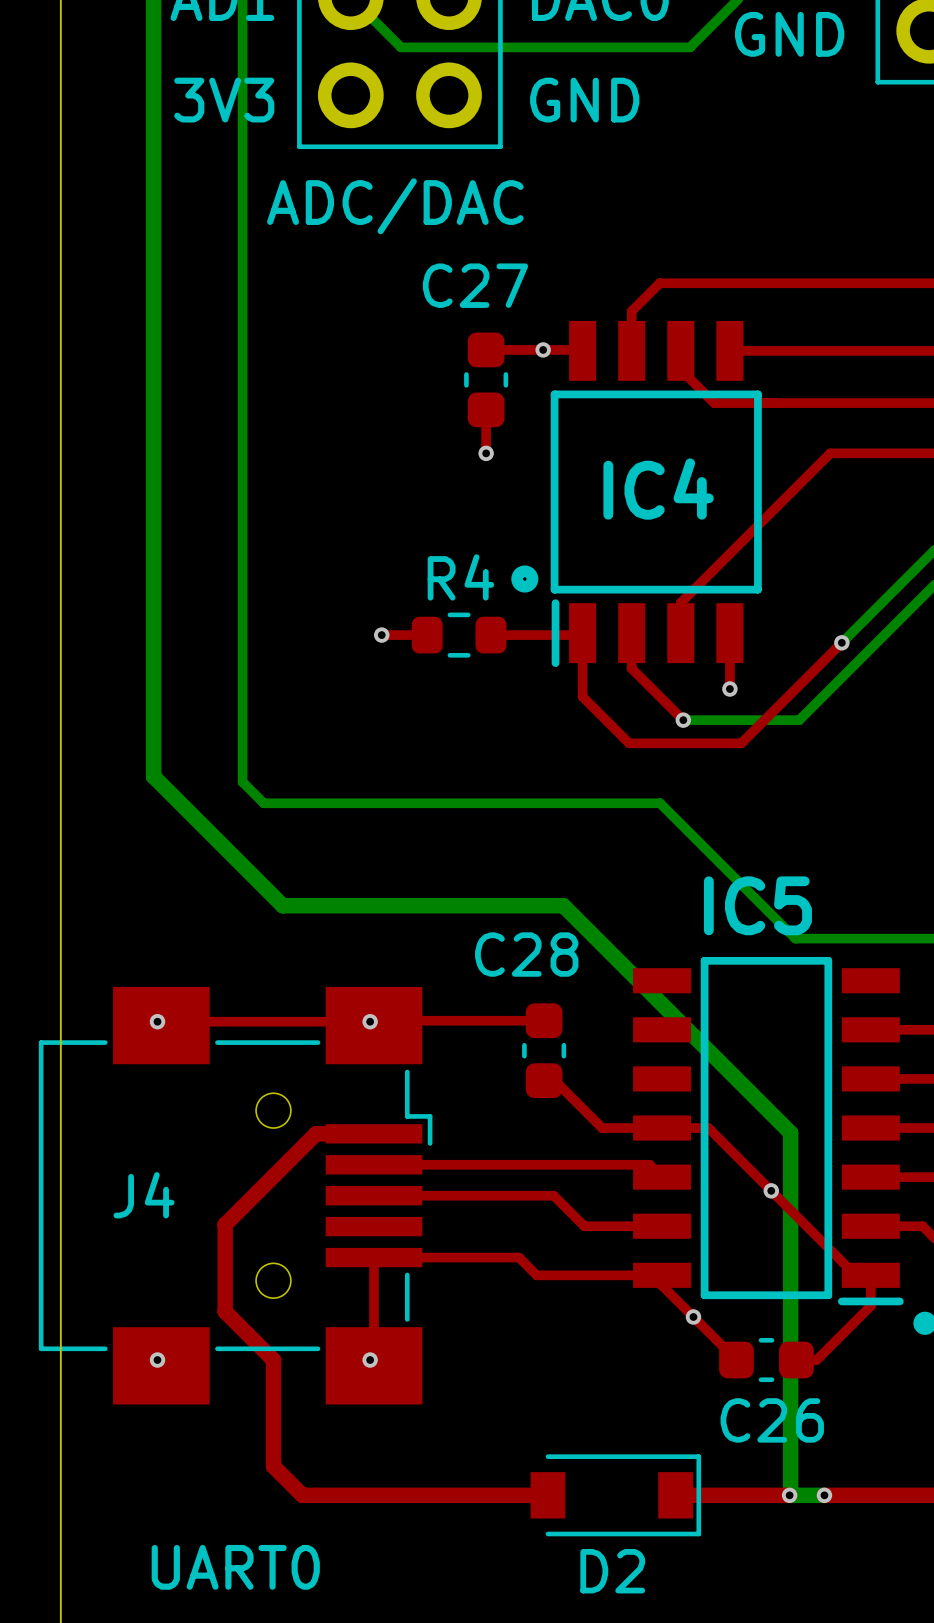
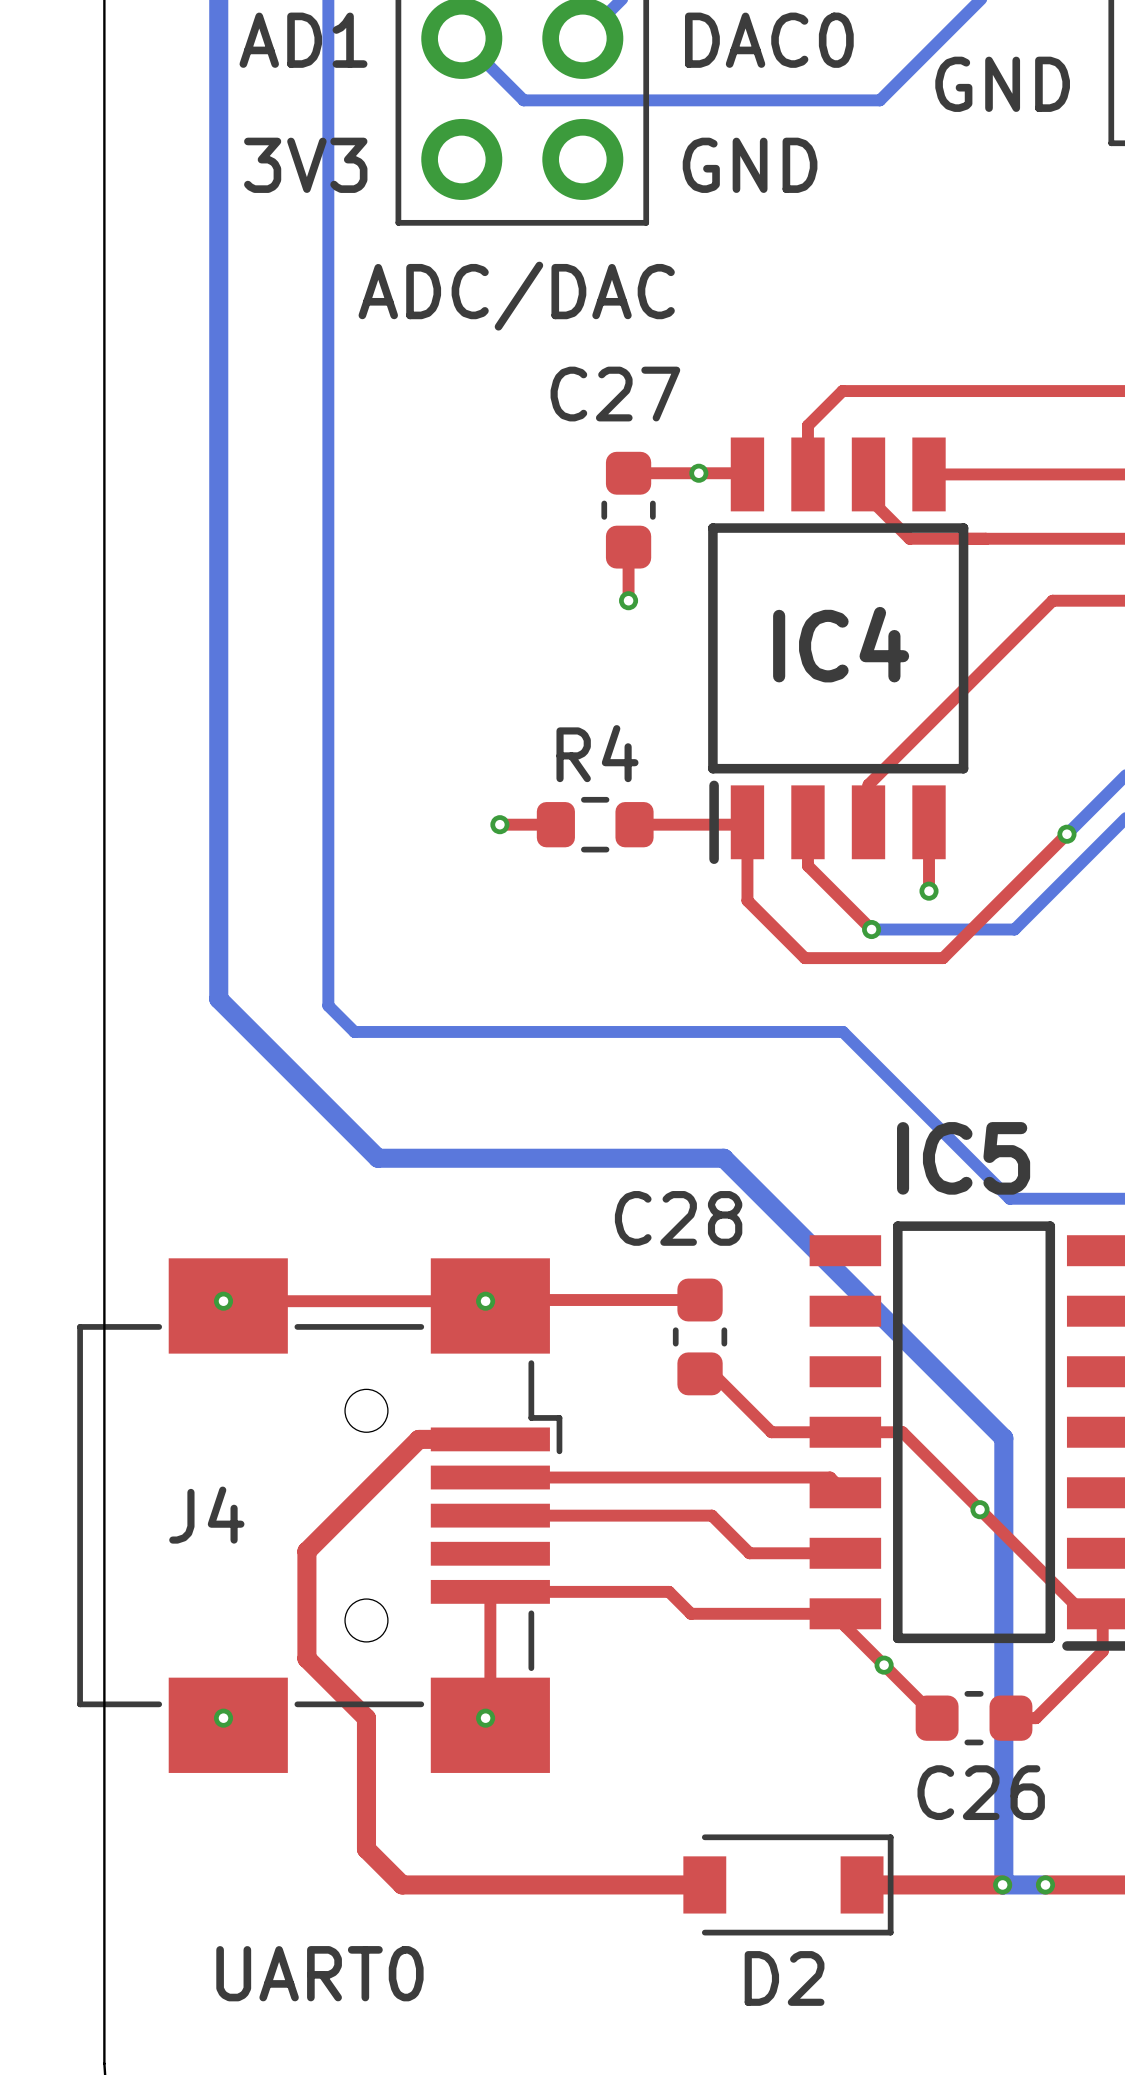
drawing: [511, 565, 539, 593] -> none

